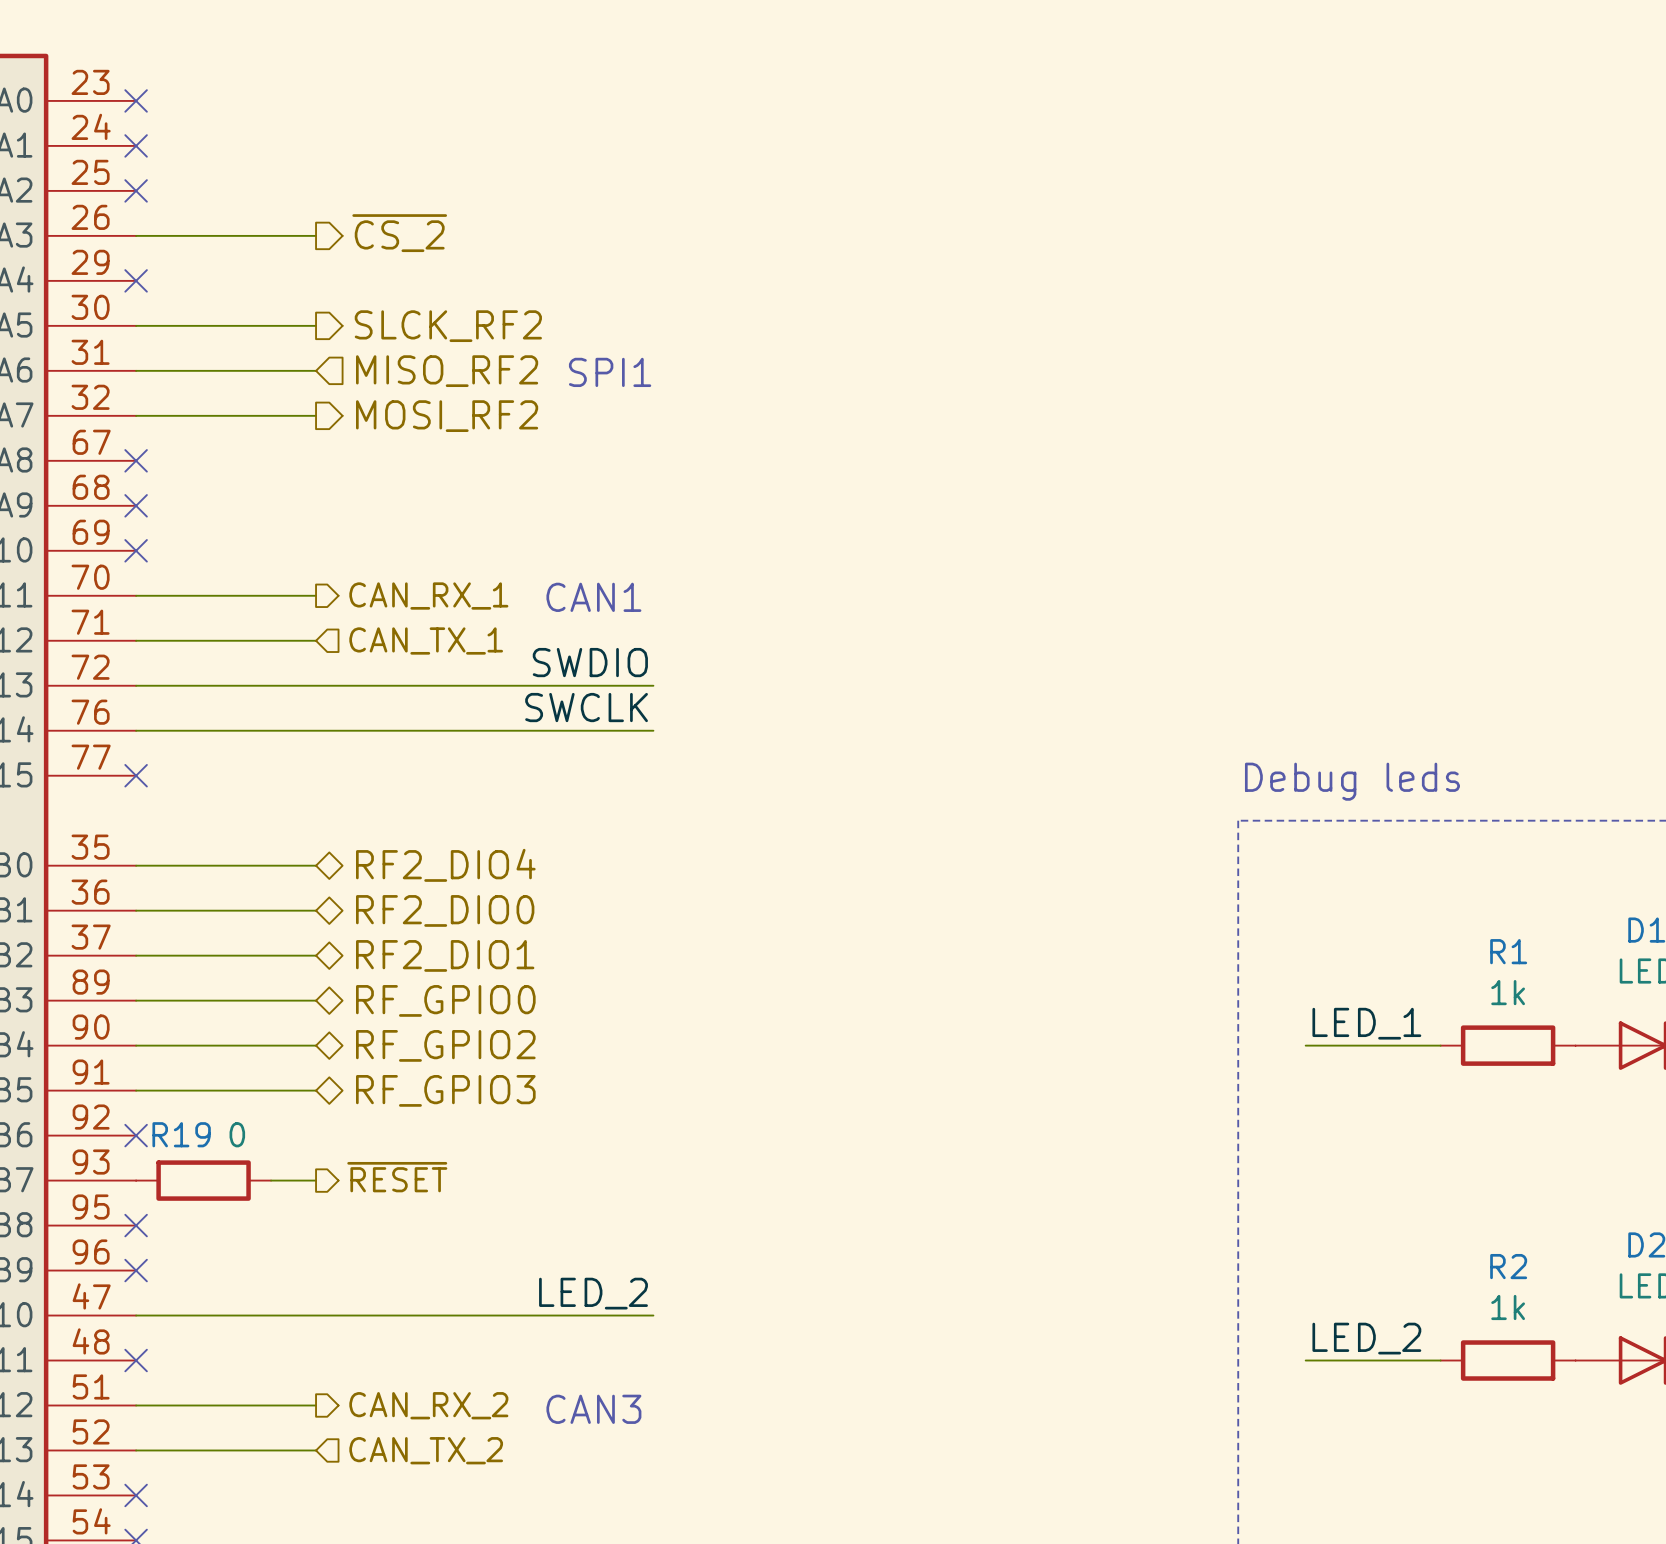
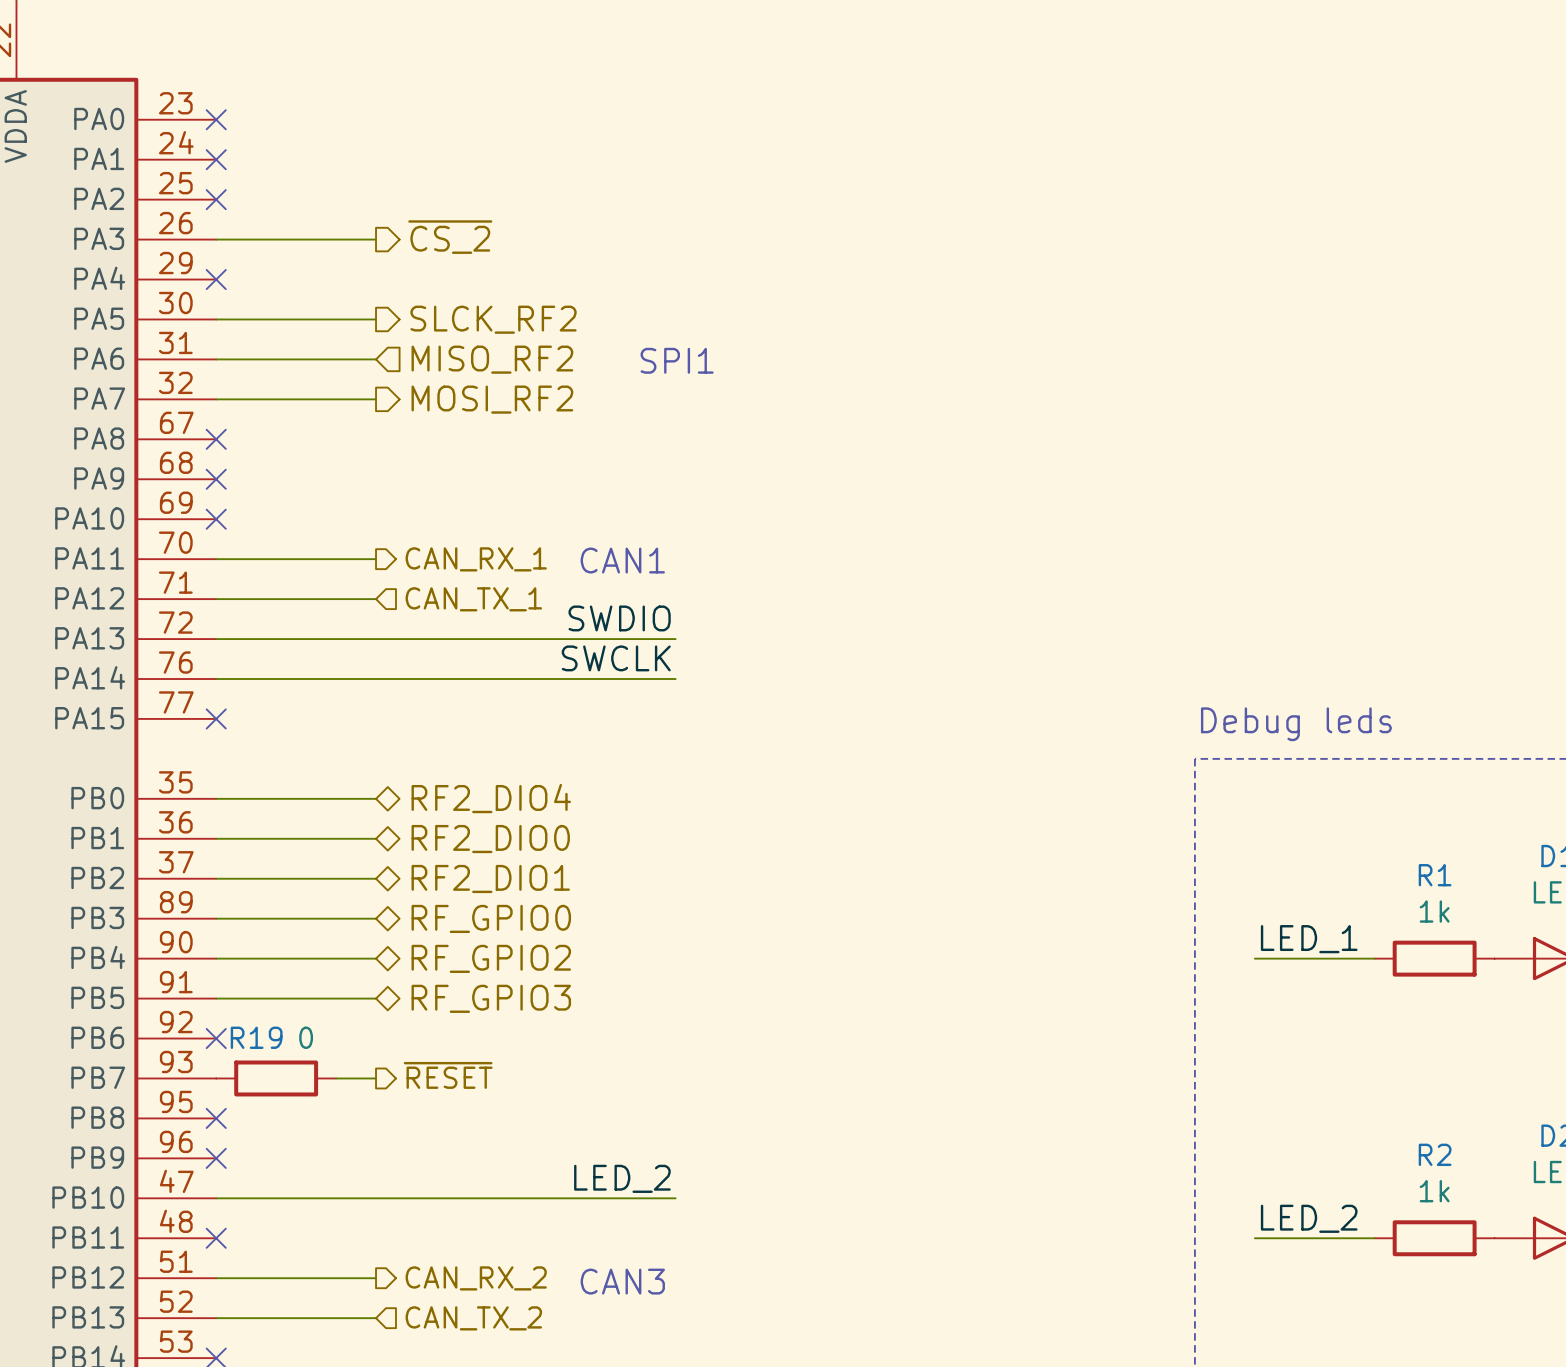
text position: SPI1 (610, 372) -> SPI1 (677, 360)

